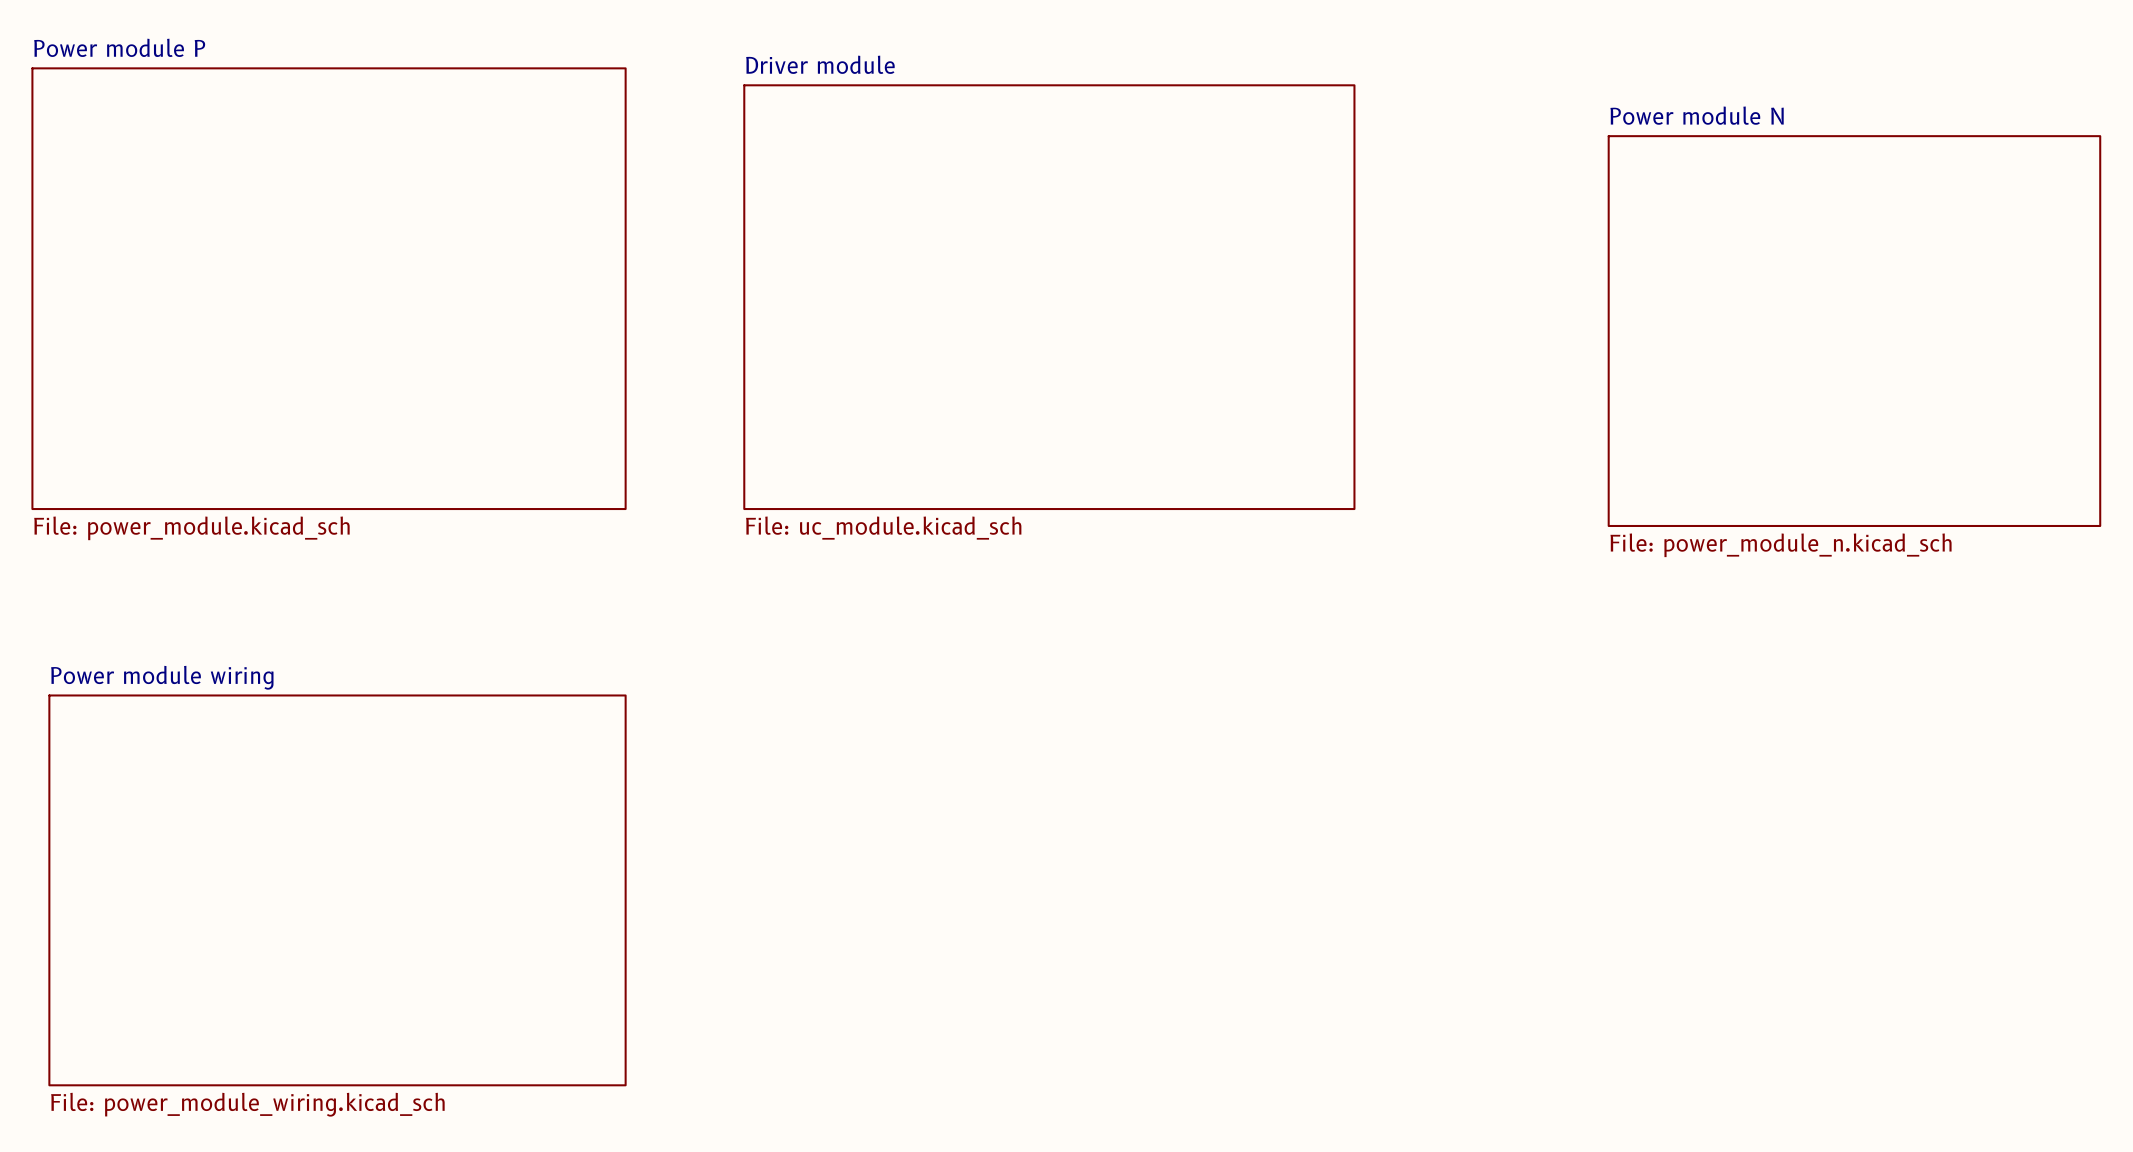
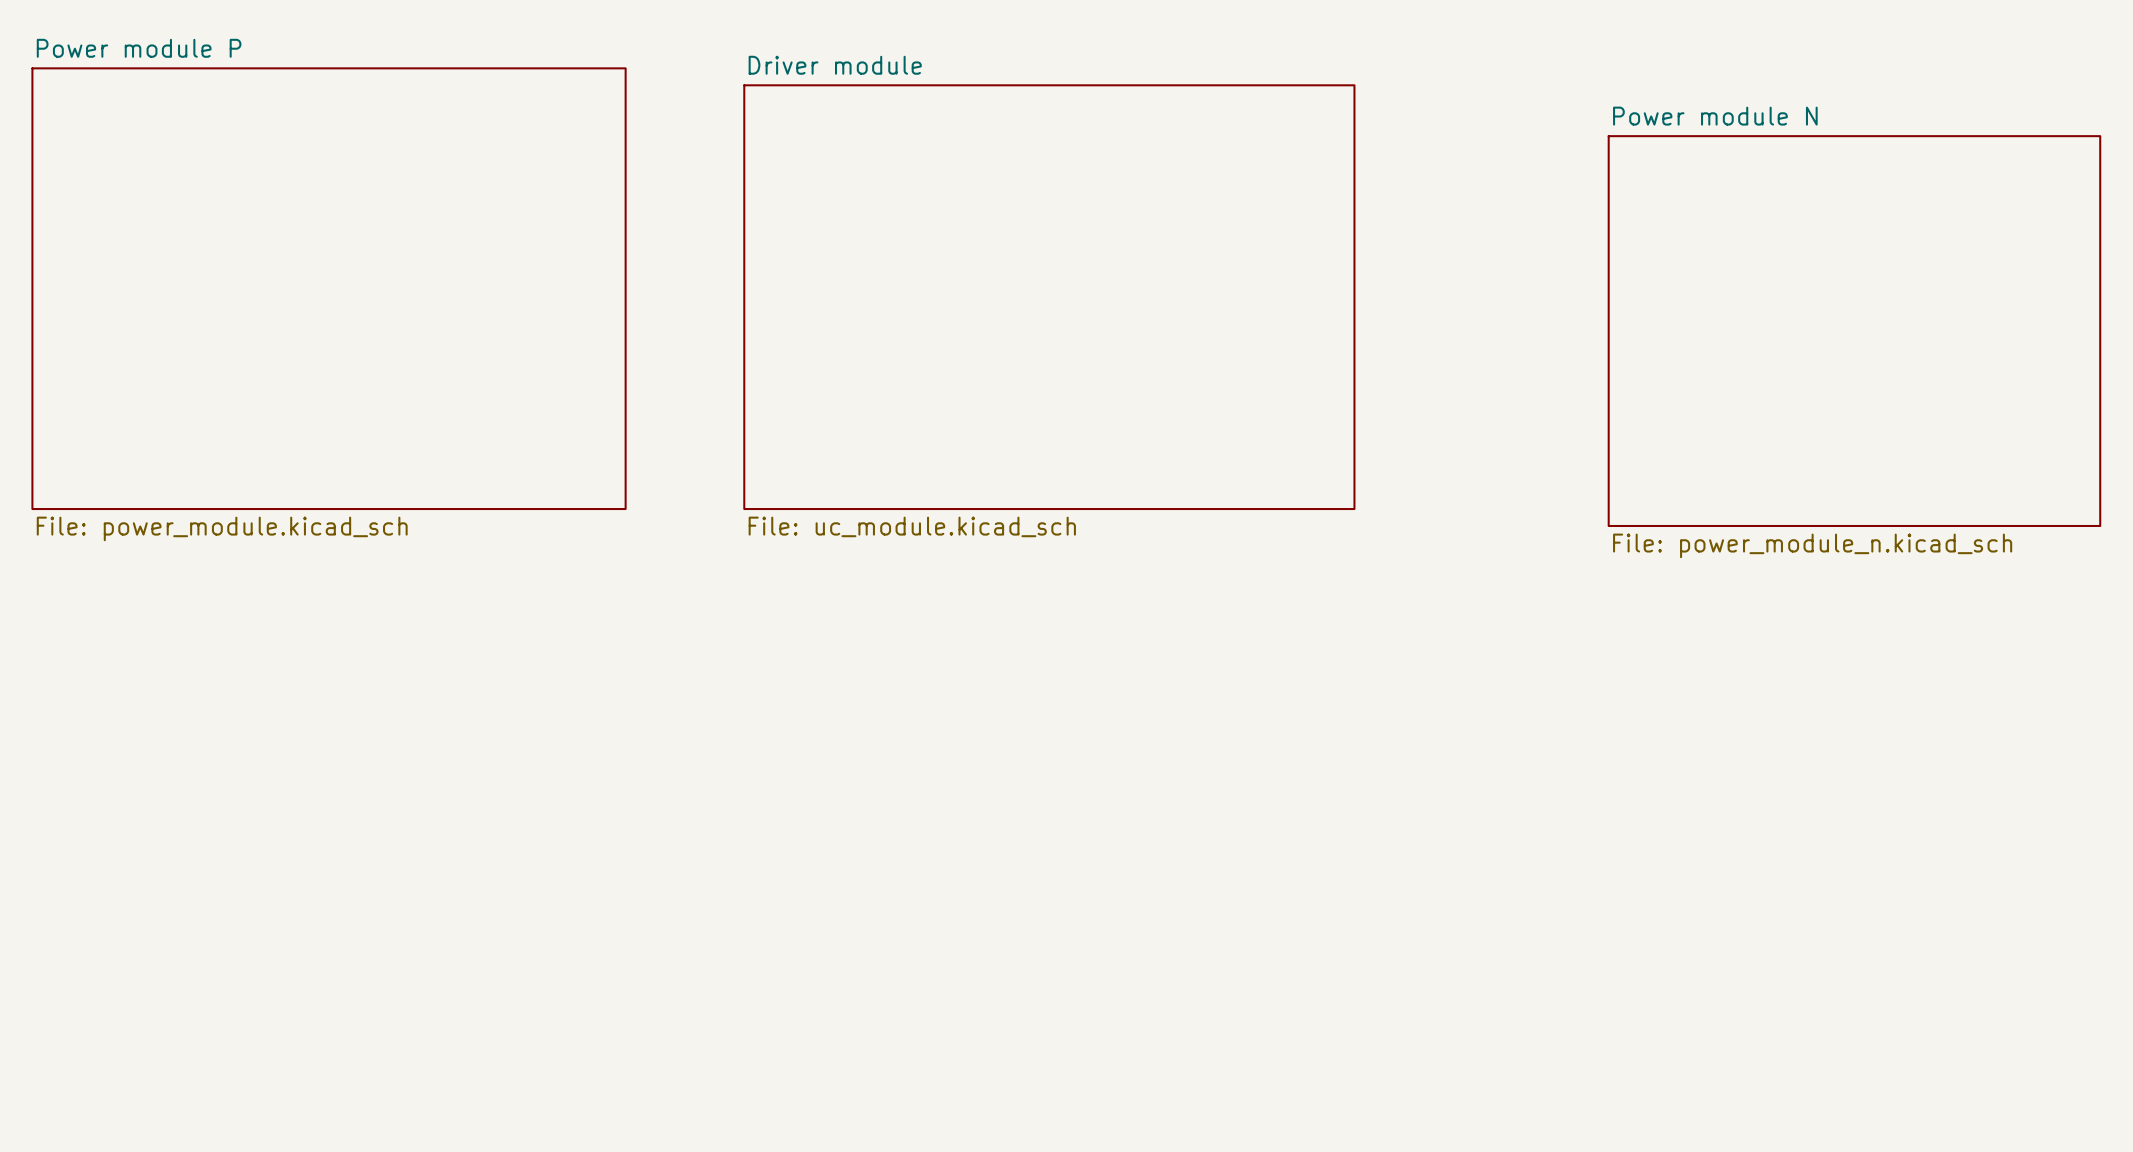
sheet Power module wiring: File: power_module_wiring.kicad_sch (337, 890) -> none

